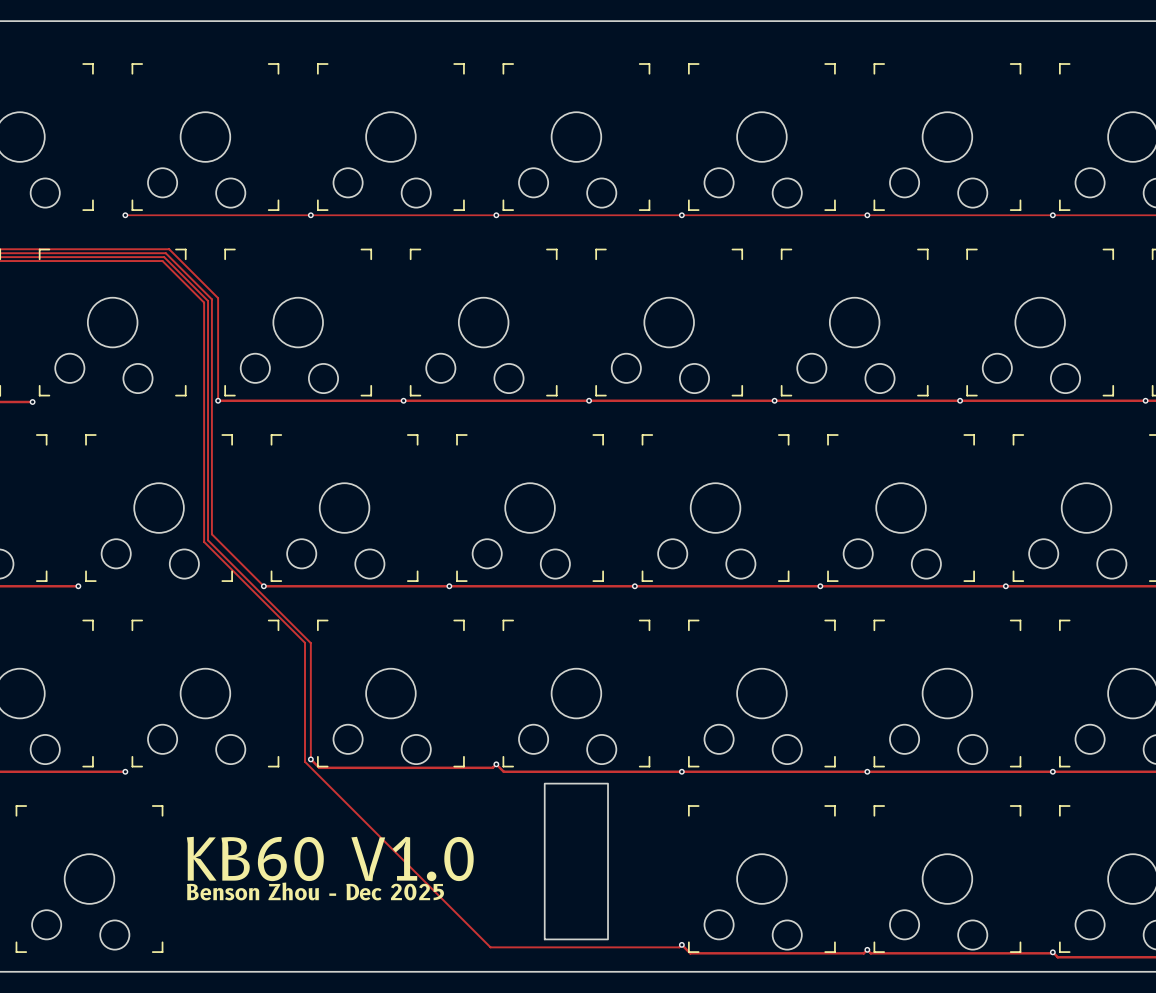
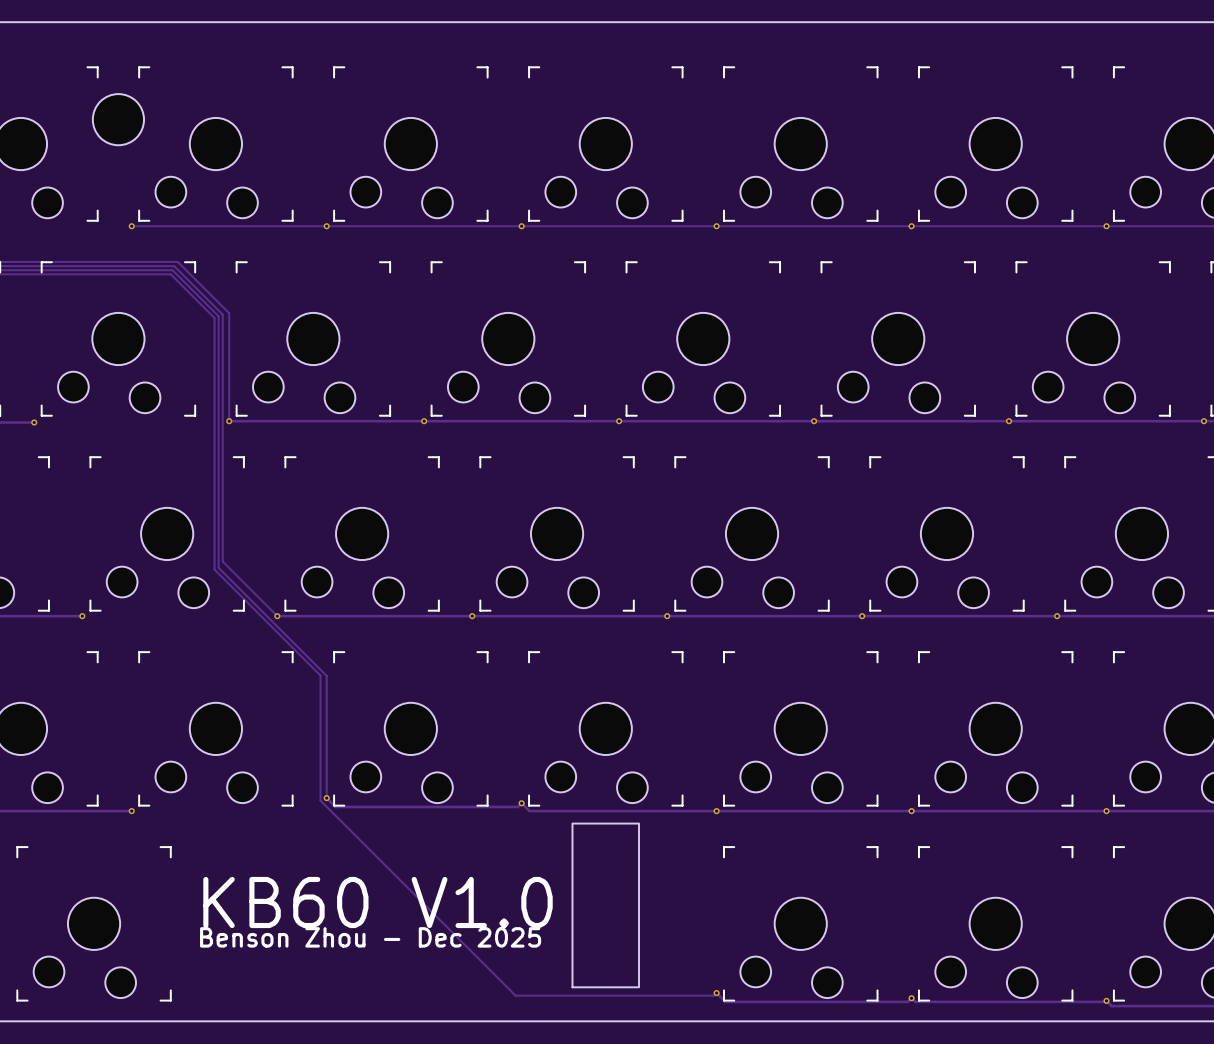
part: none -> (118, 119)

